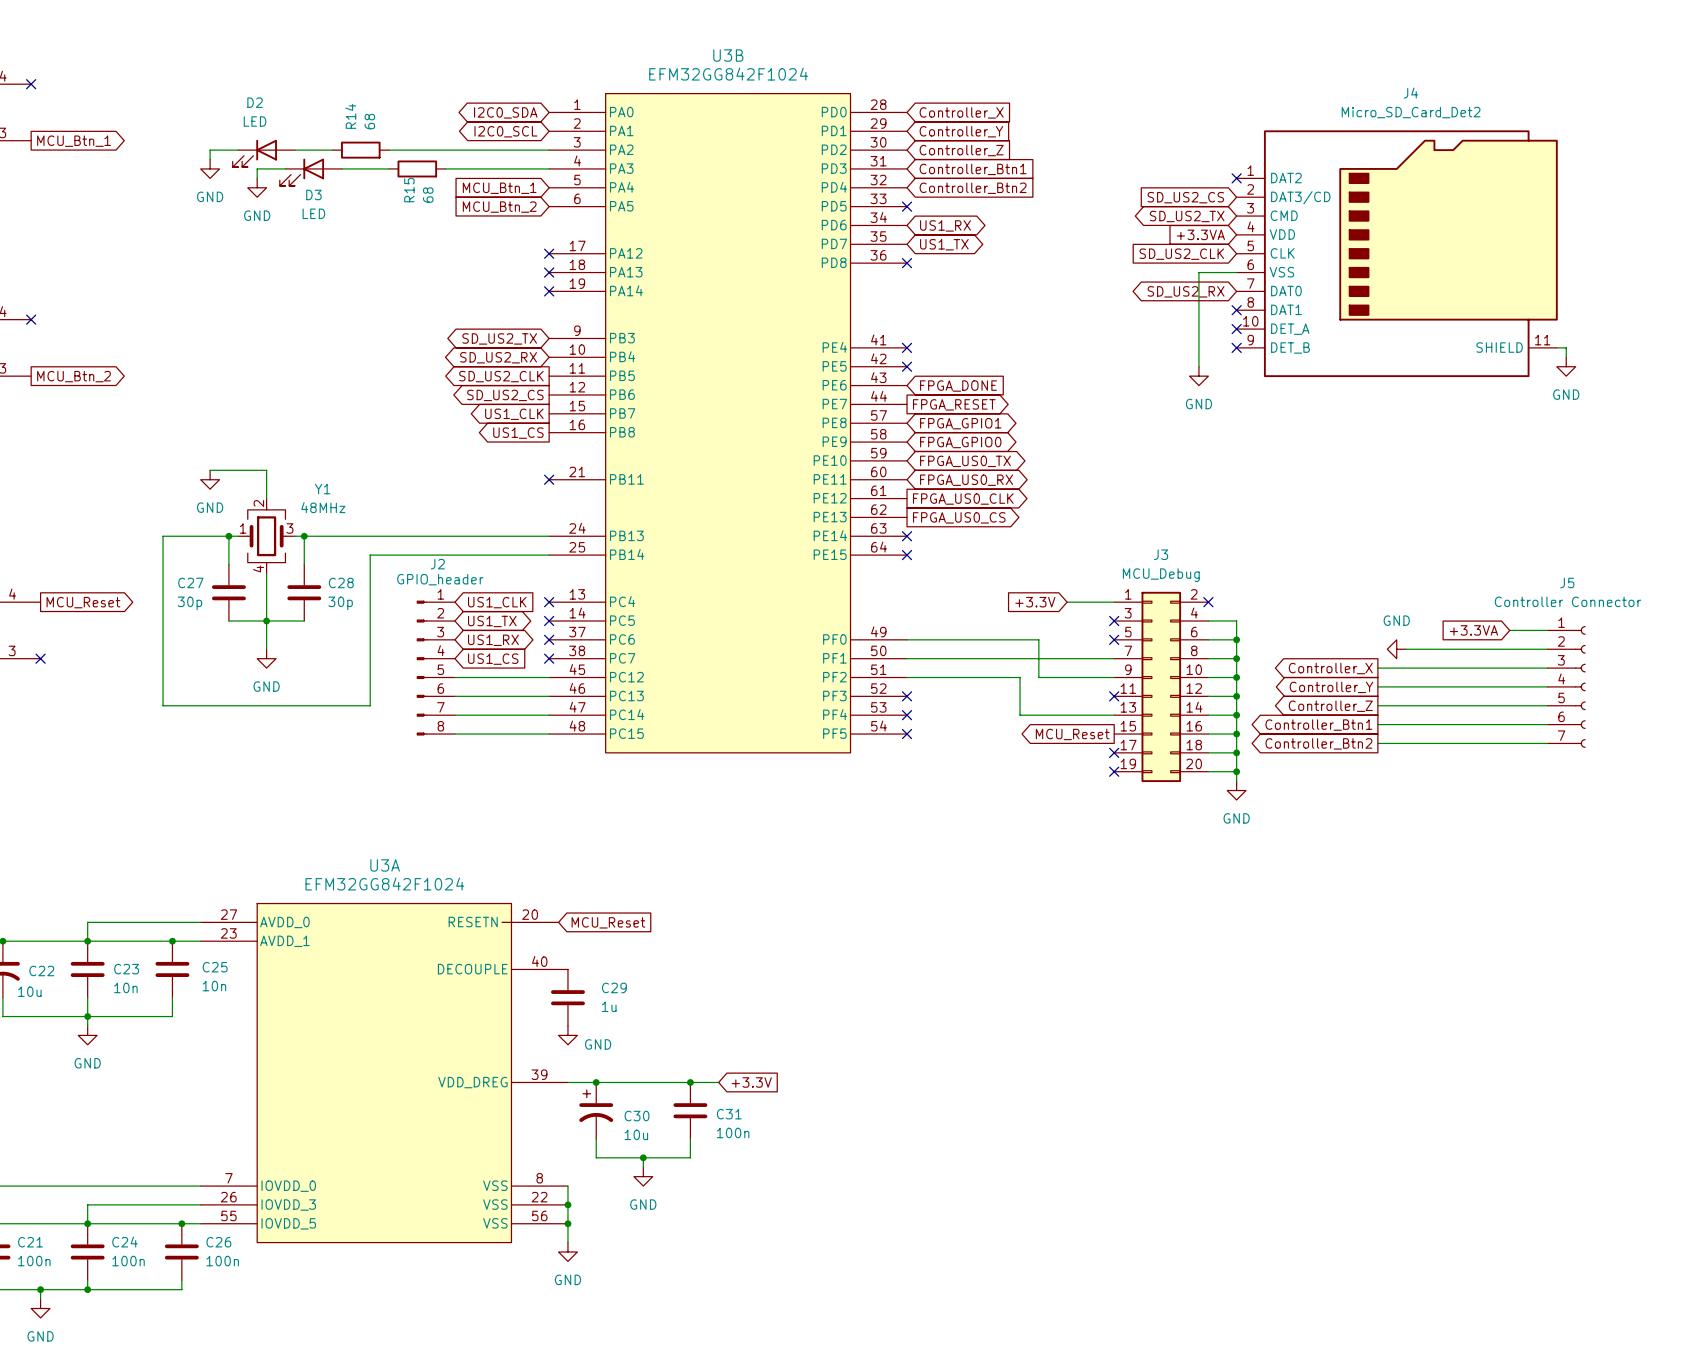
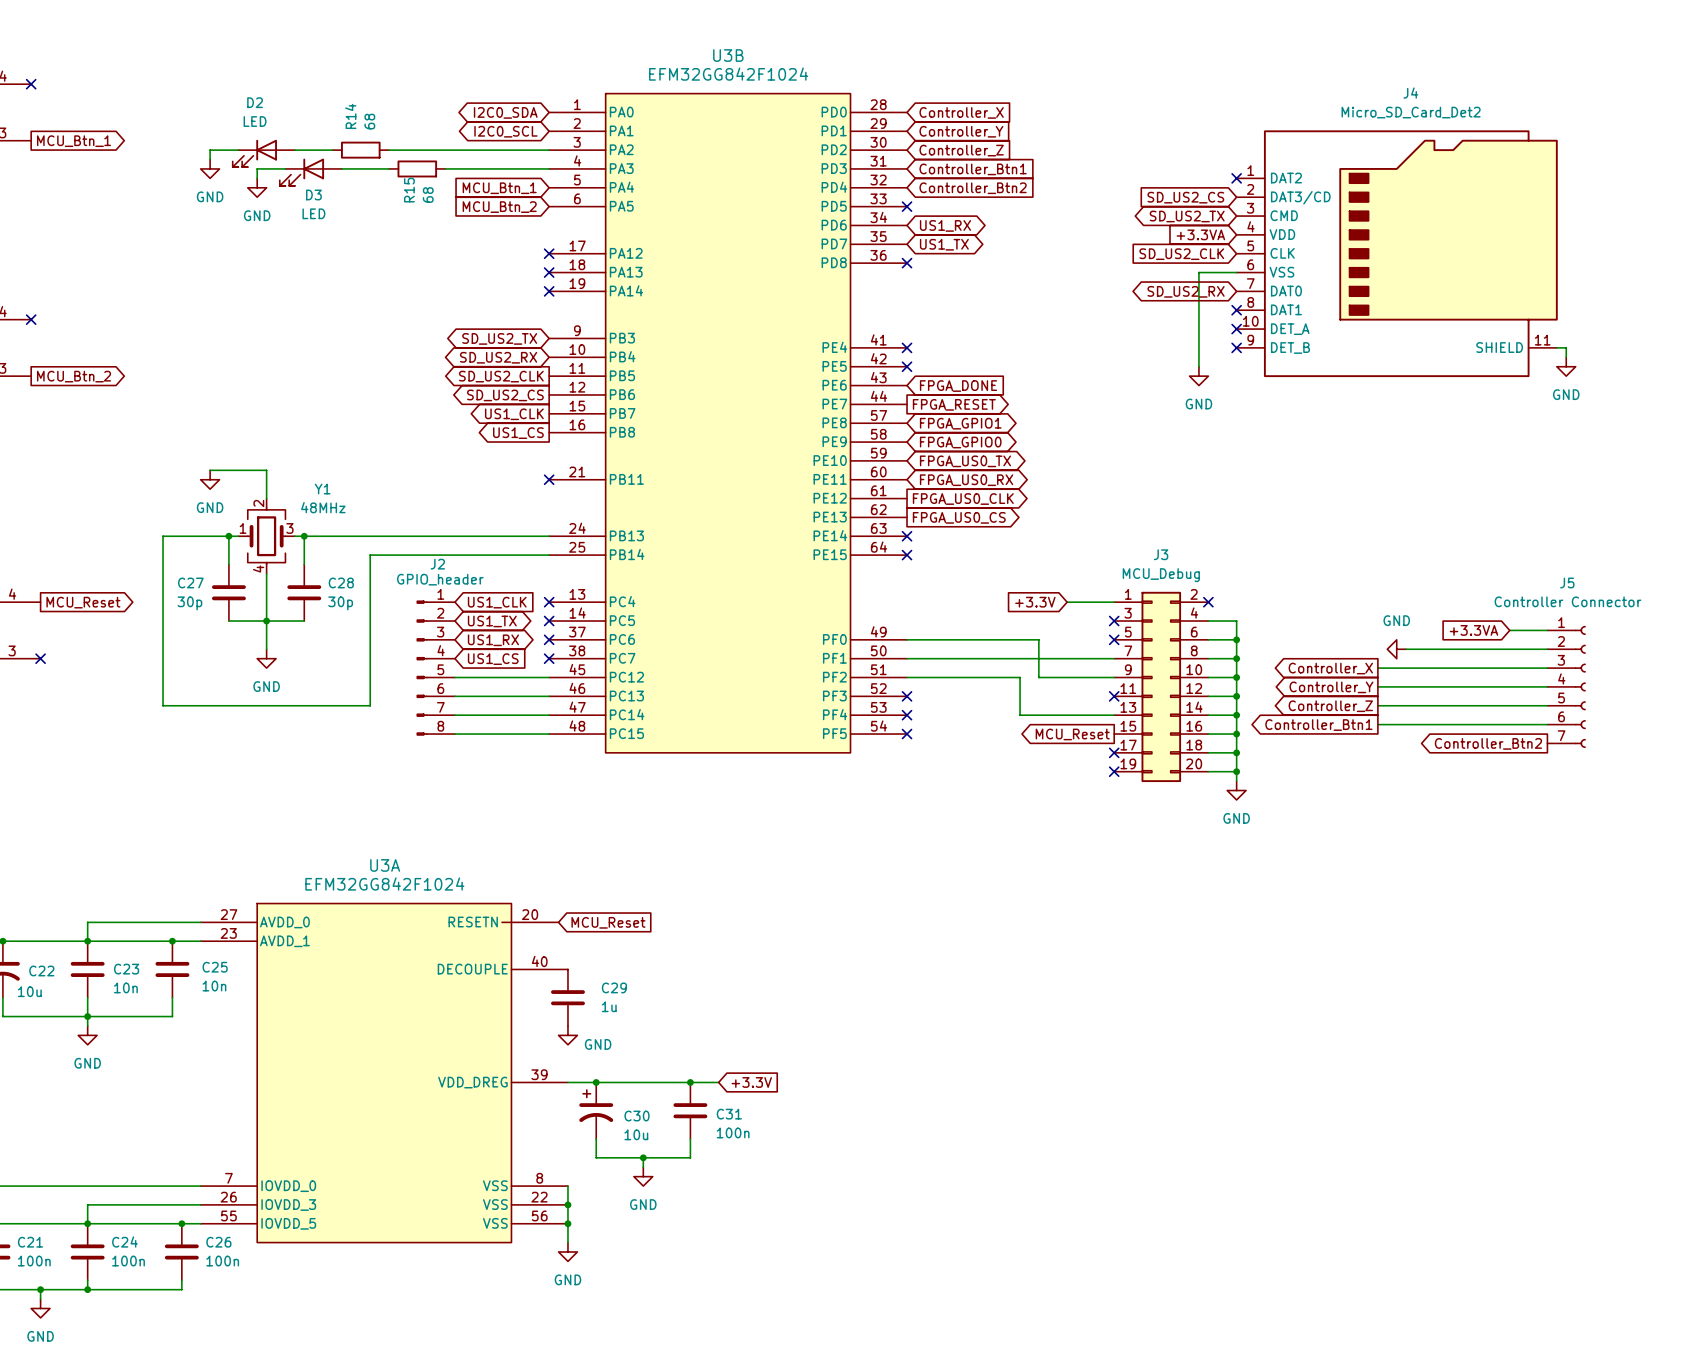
global label position: Controller_Btn2 (1318, 743) -> Controller_Btn2 (1488, 743)
wire: (1377, 743) (1547, 743) -> none

